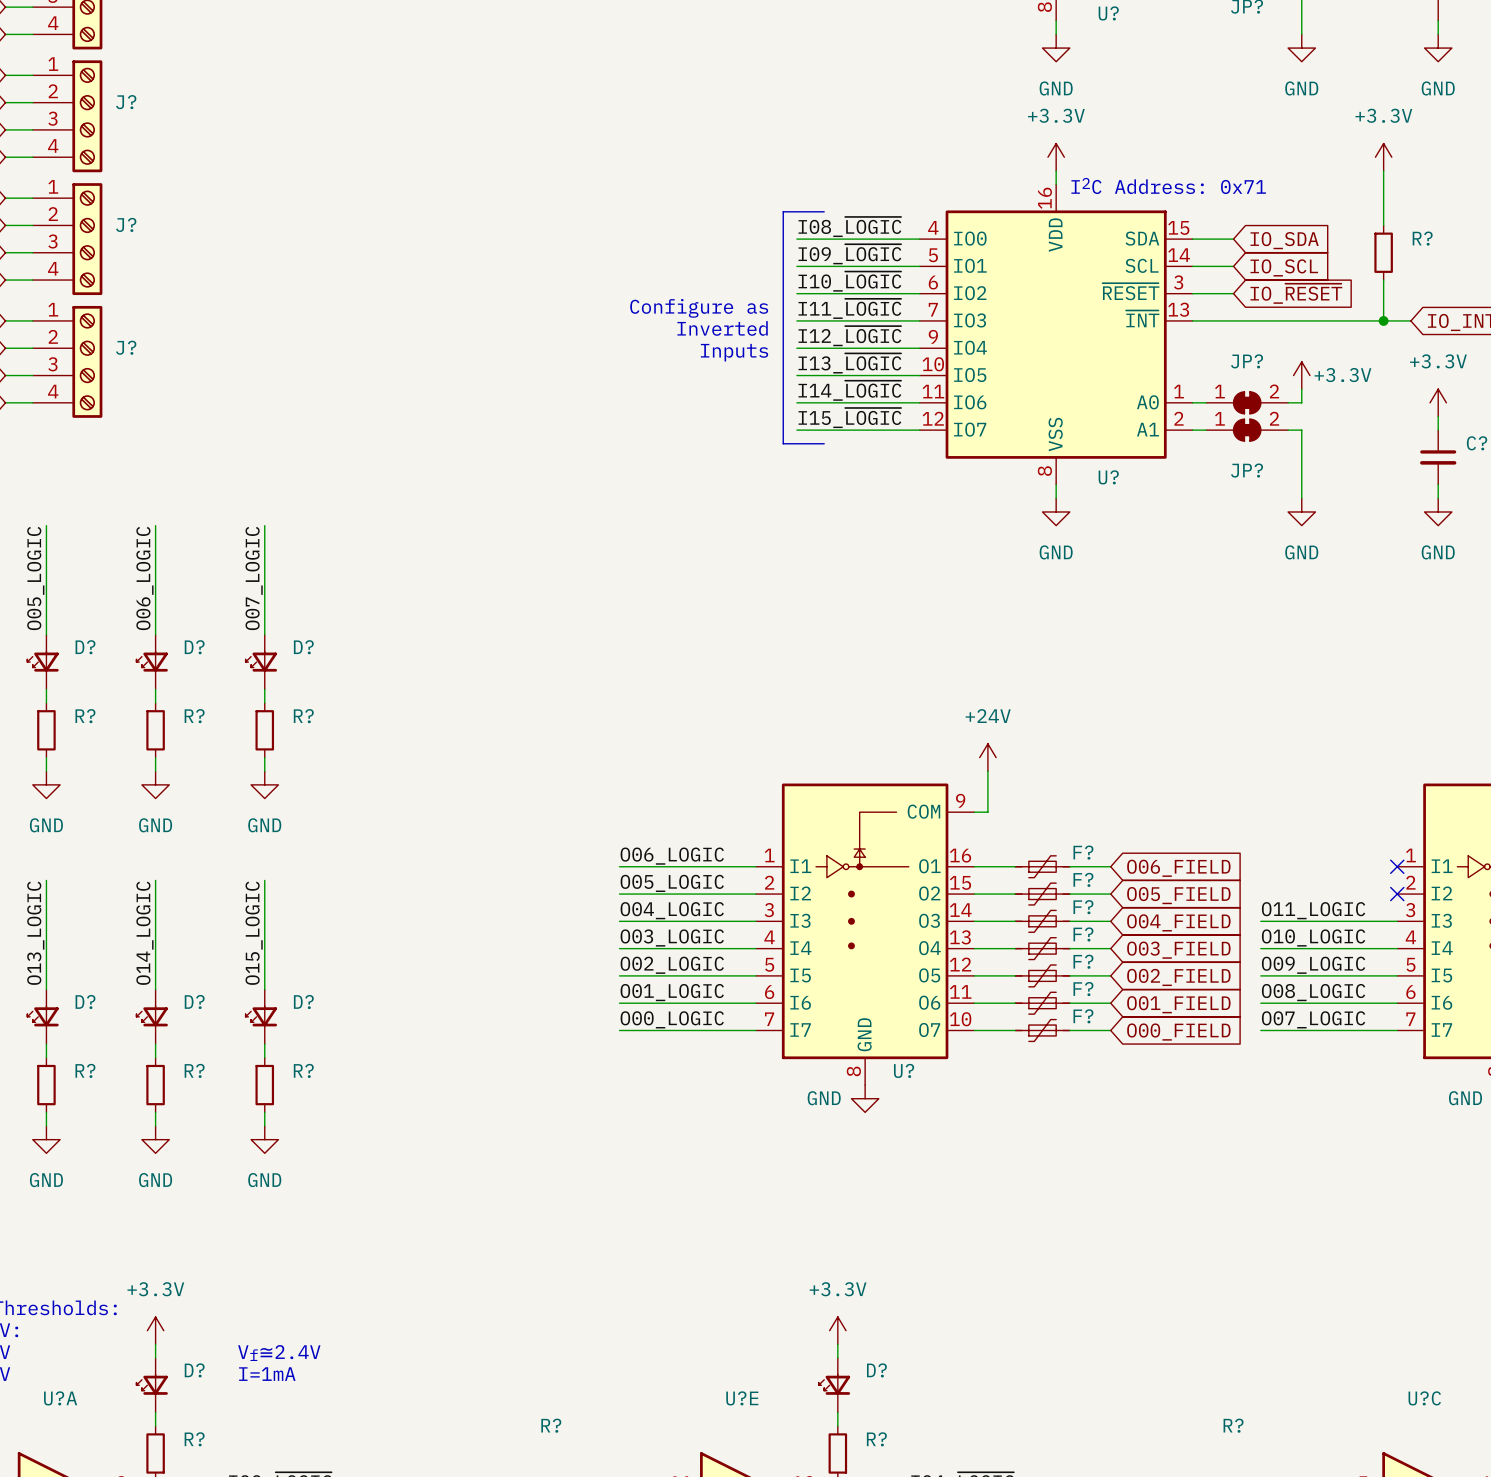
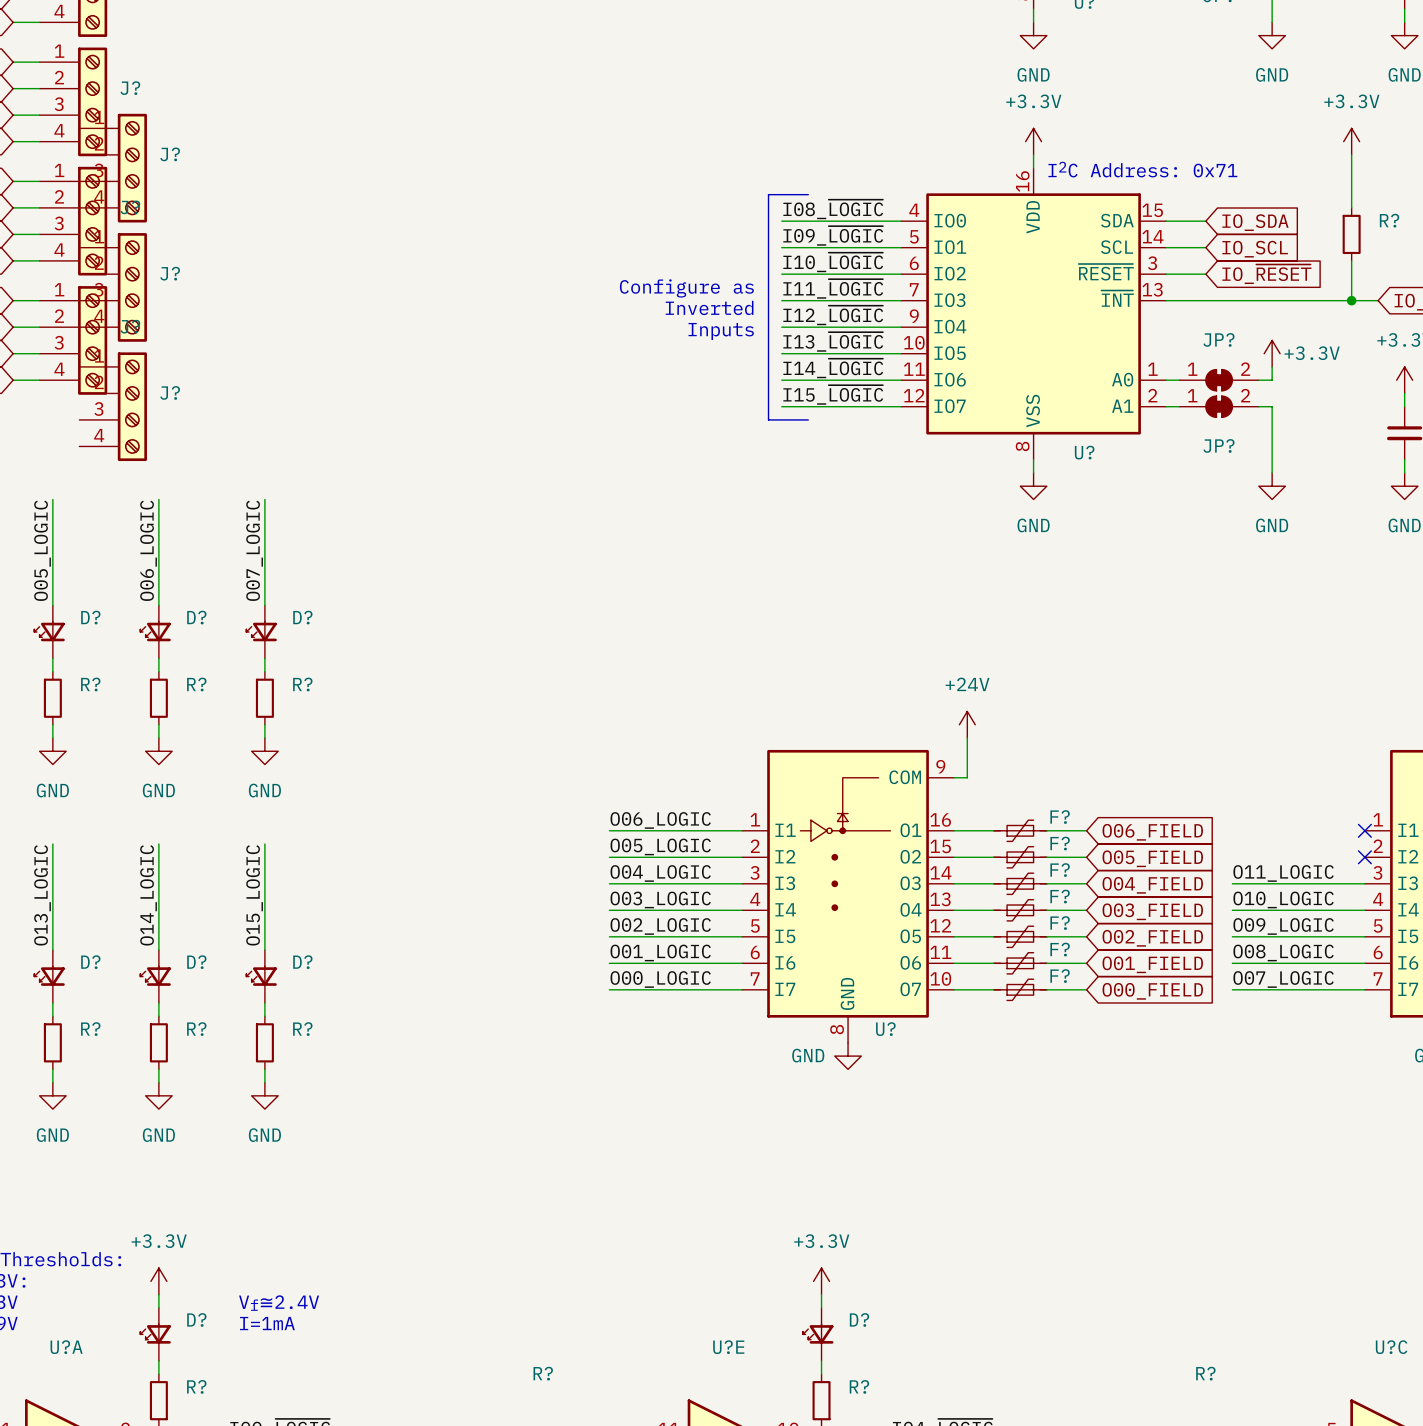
J?: none -> (113, 168)
J?: none -> (113, 287)
J?: none -> (113, 406)

